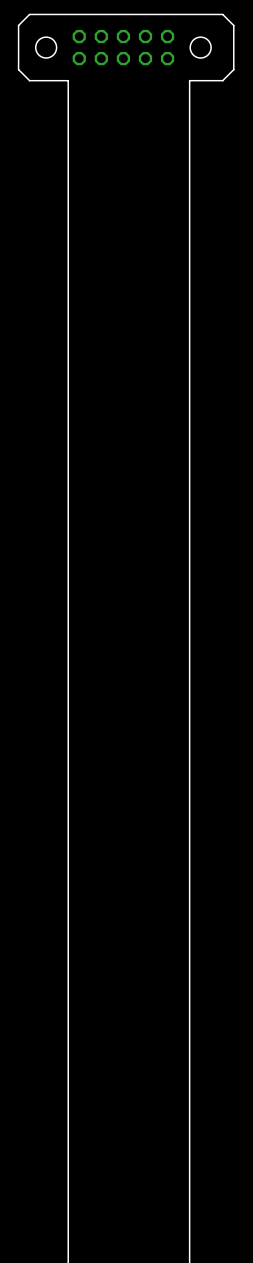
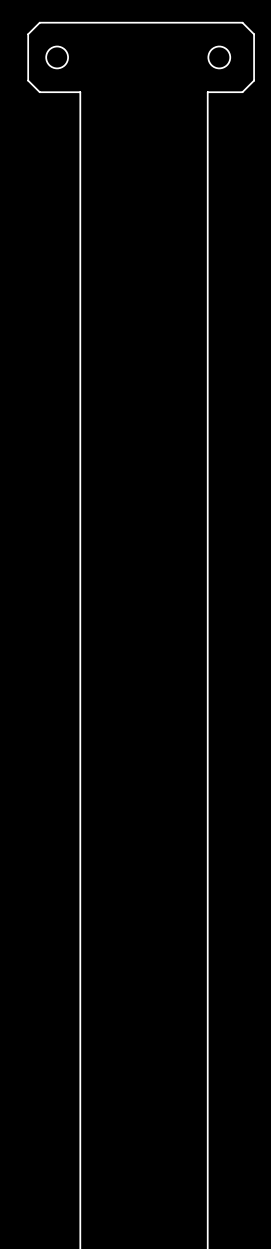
part: (123, 47) -> none

